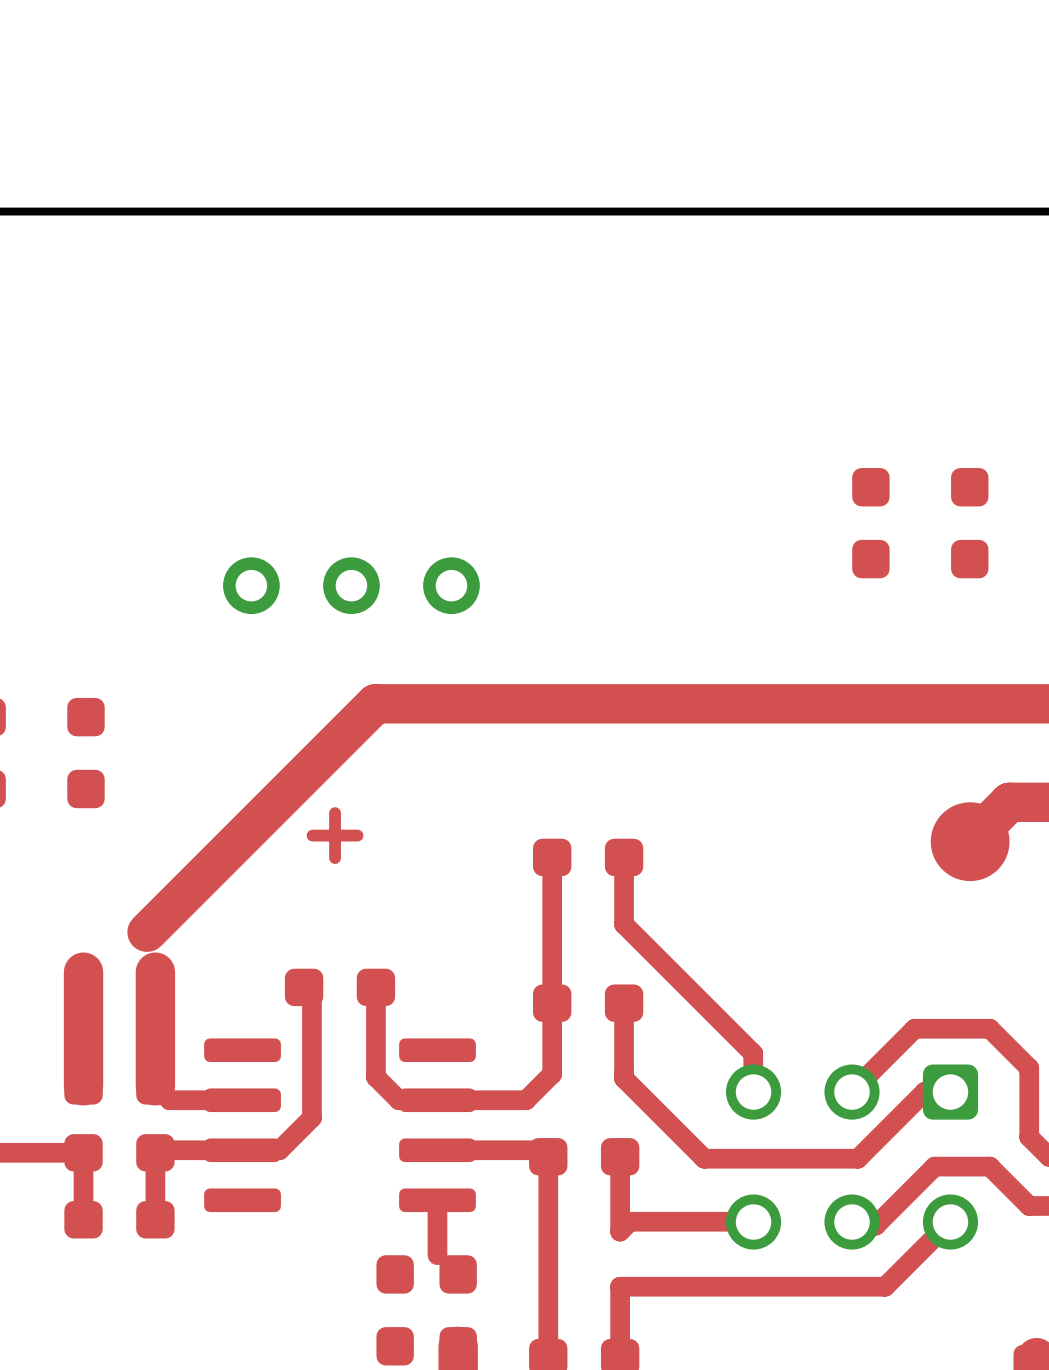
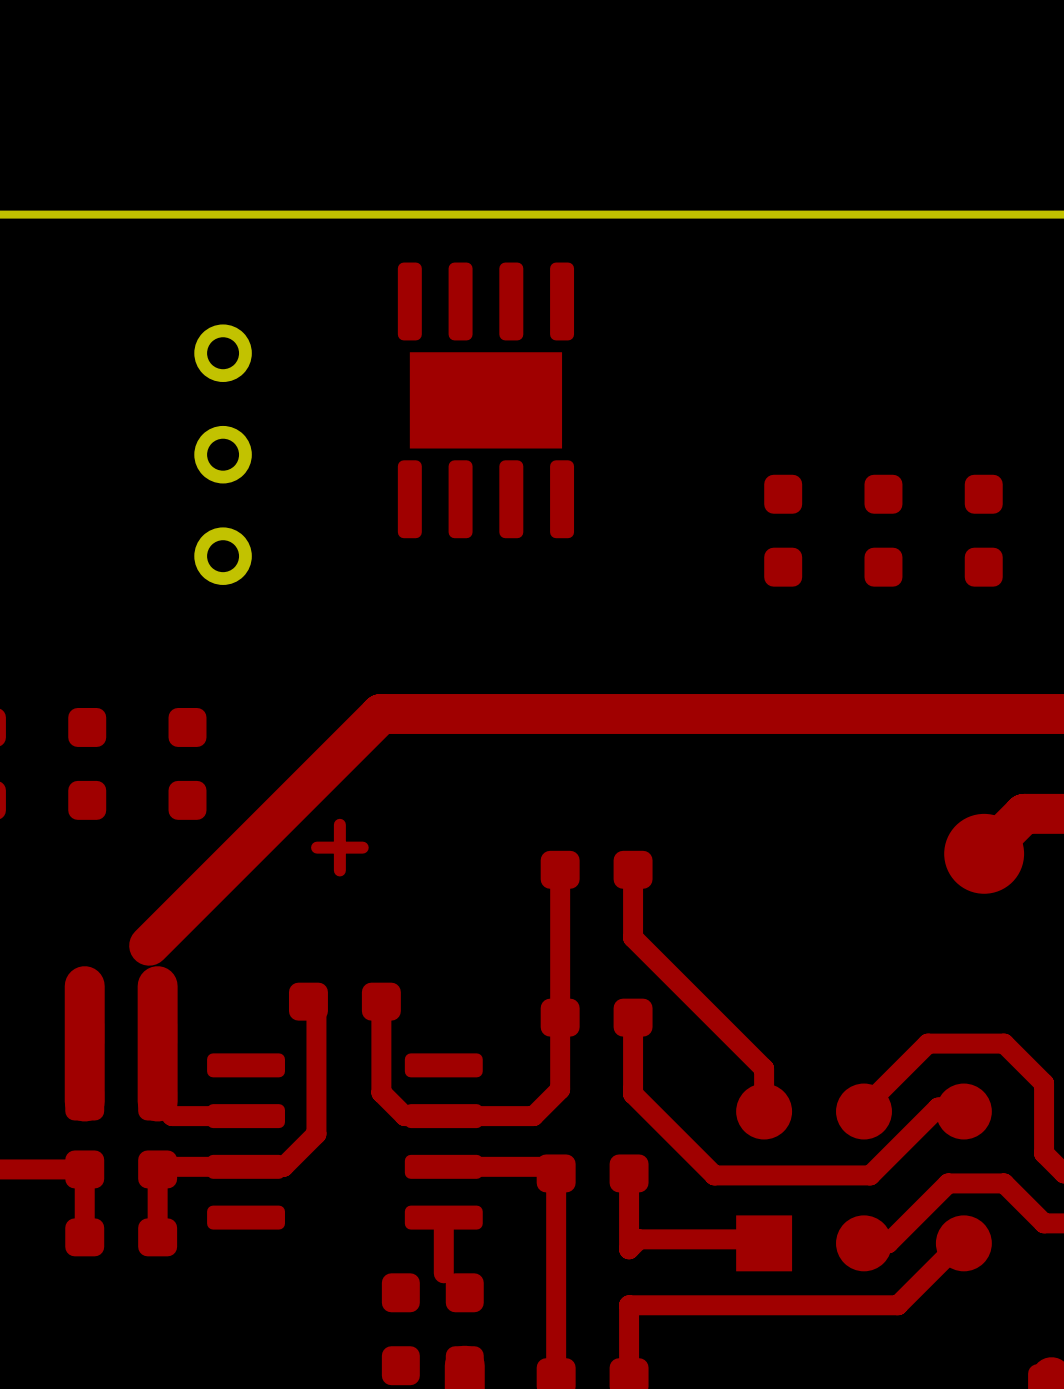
part: none -> (485, 400)
part: none -> (783, 530)
part rotation: 0° (351, 585) -> 90° clockwise (223, 454)
part position: (351, 585) -> (223, 454)
part: none -> (187, 763)
part footprint: [725, 1064, 979, 1250] -> [736, 1083, 992, 1272]

